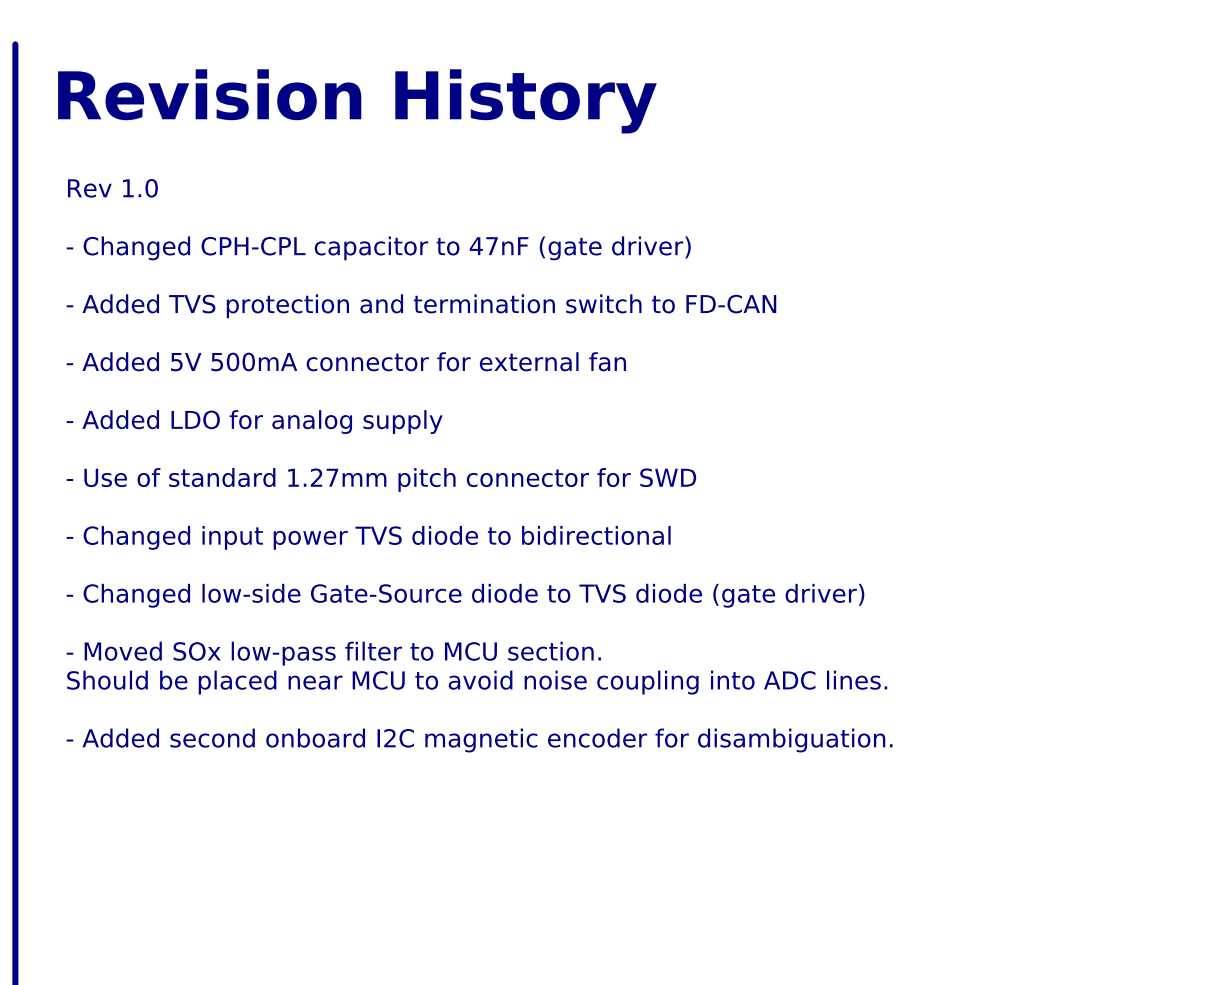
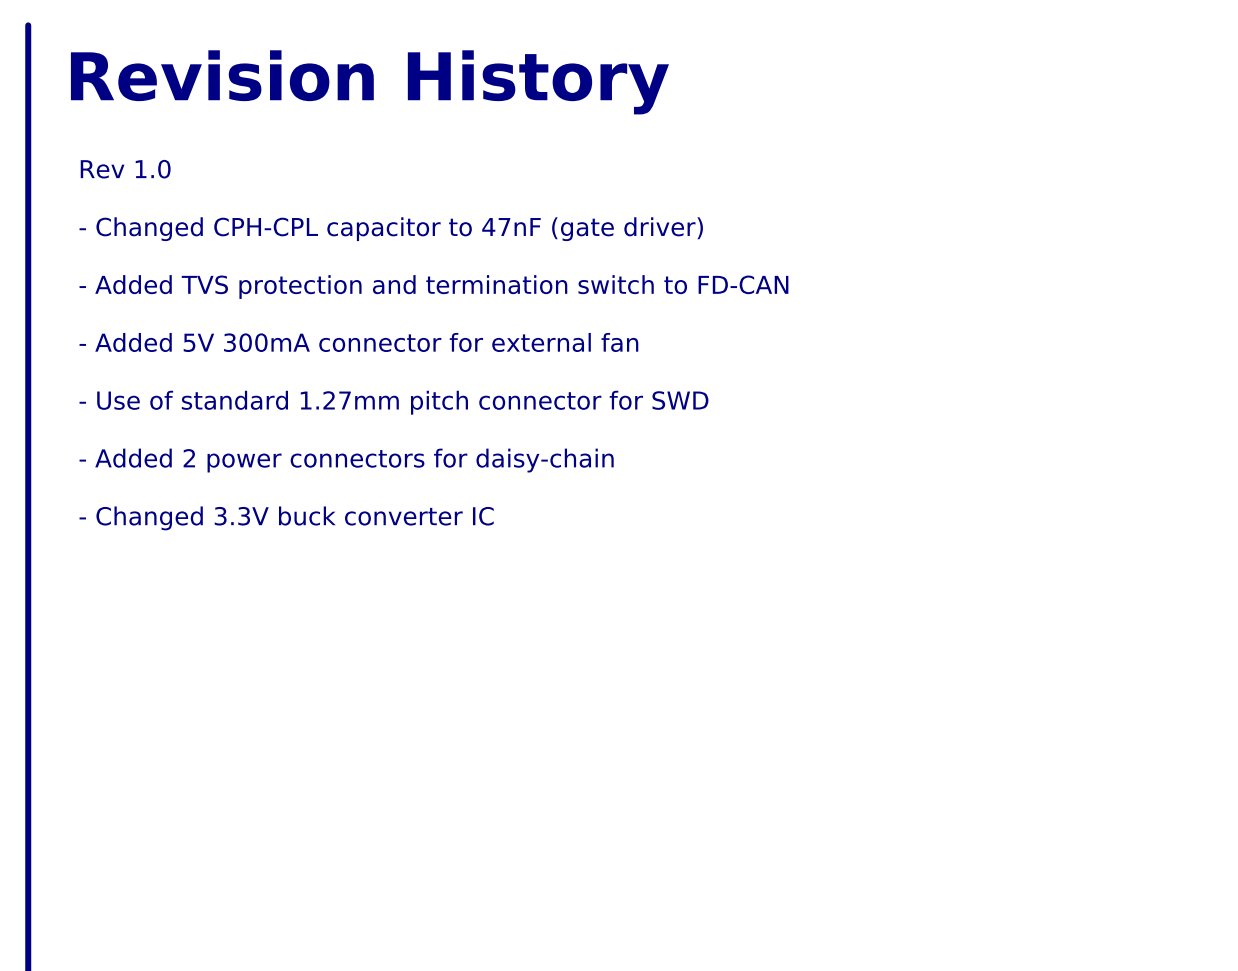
text: - Added 5V 500mA connector for external fan (346, 361) -> - Added 5V 300mA connector for external fan (358, 342)
text: - Added LDO for analog supply (254, 422) -> - Use of standard 1.27mm pitch connector for SWD (393, 402)
text: - Use of standard 1.27mm pitch connector for SWD (381, 479) -> - Added 2 power connectors for daisy-chain (346, 460)
text: - Changed input power TVS diode to bidirectional (368, 537) -> - Changed 3.3V buck converter IC (286, 518)
text: - Changed low-side Gate-Source diode to TVS diode (gate driver) (465, 595) -> none
text: - Moved SOx low-pass filter to MCU section. (333, 653) -> none
text: Should be placed near MCU to avoid noise coupling into ADC lines. (477, 682) -> none
text: - Added second onboard I2C magnetic encoder for disambiguation. (479, 740) -> none

